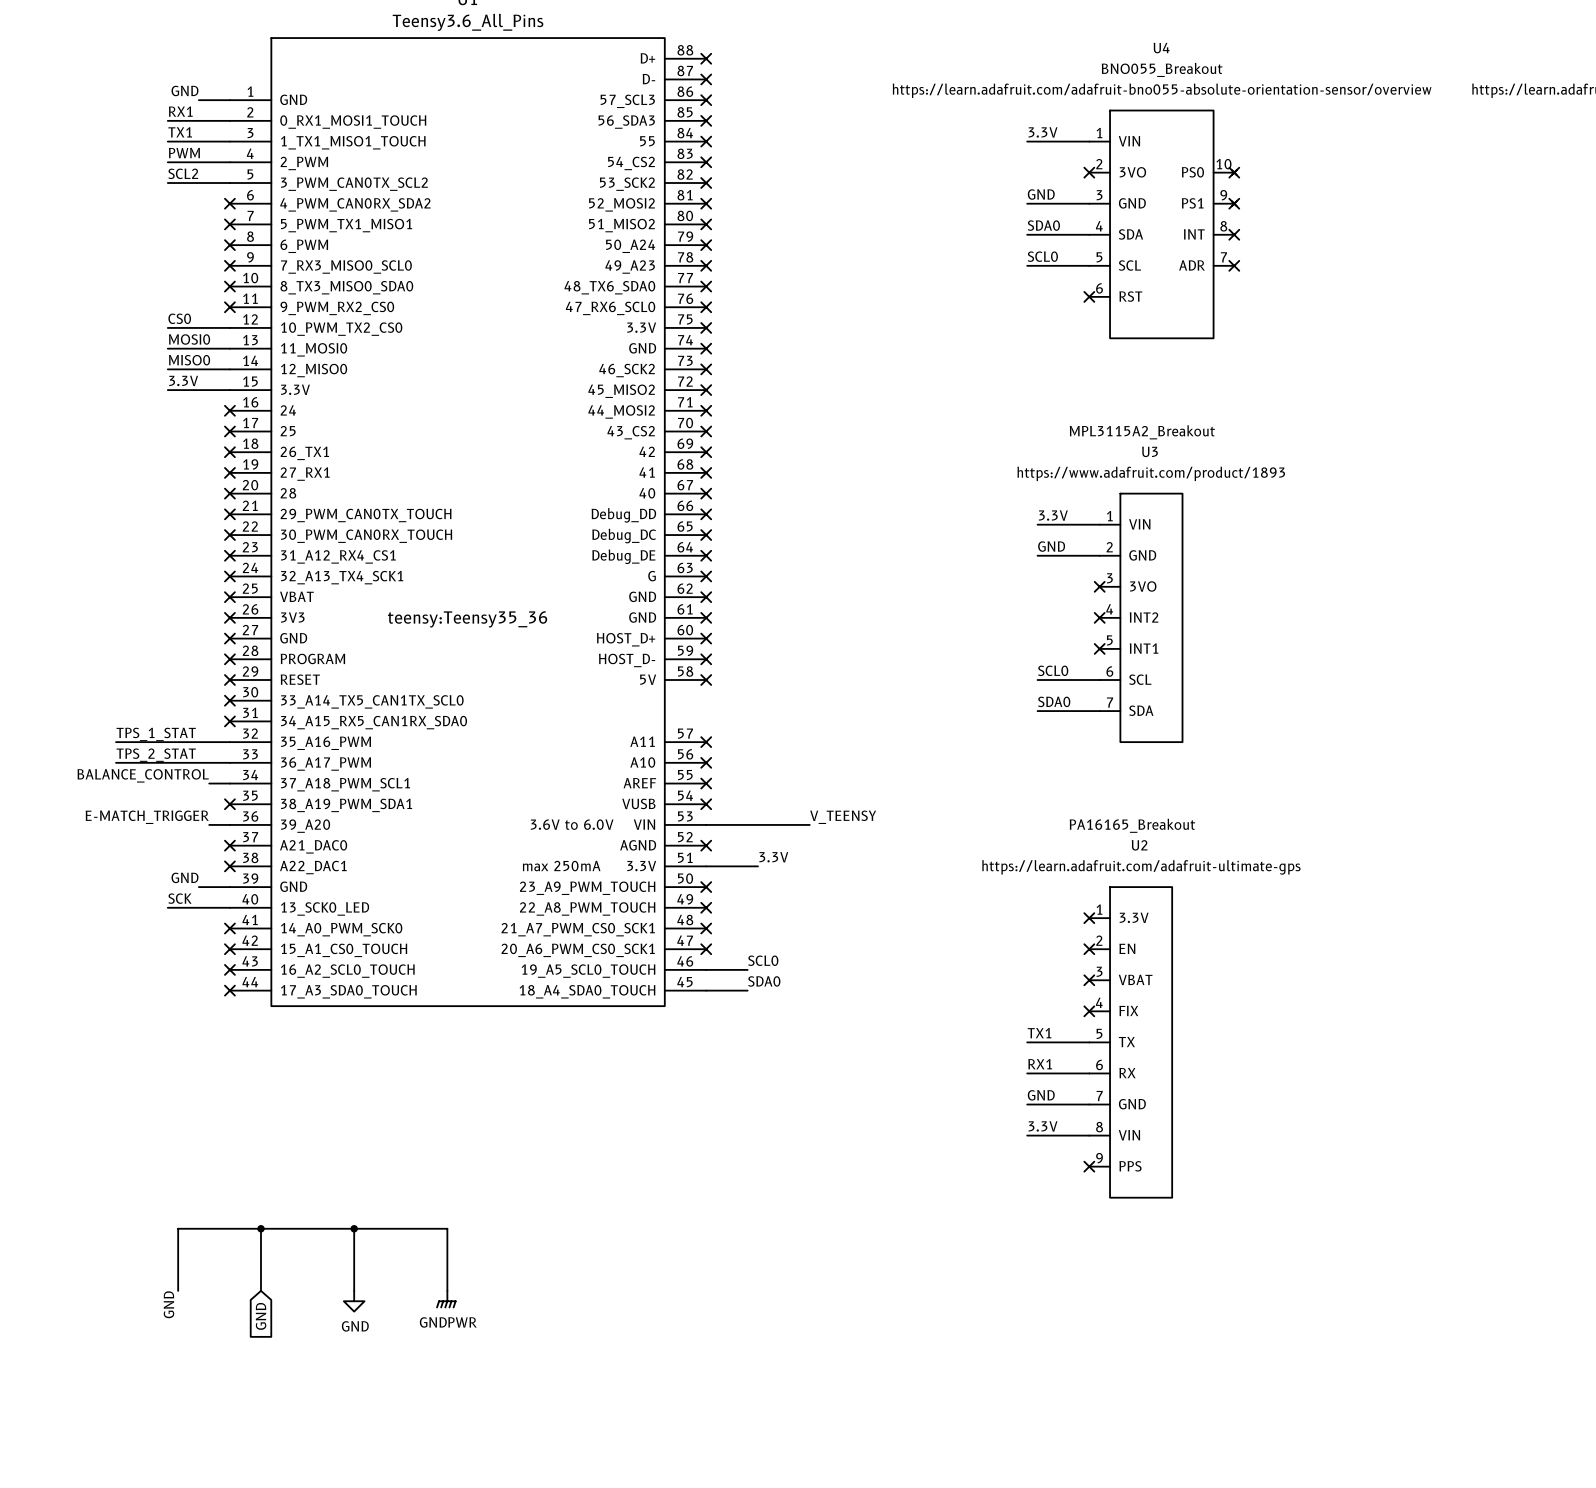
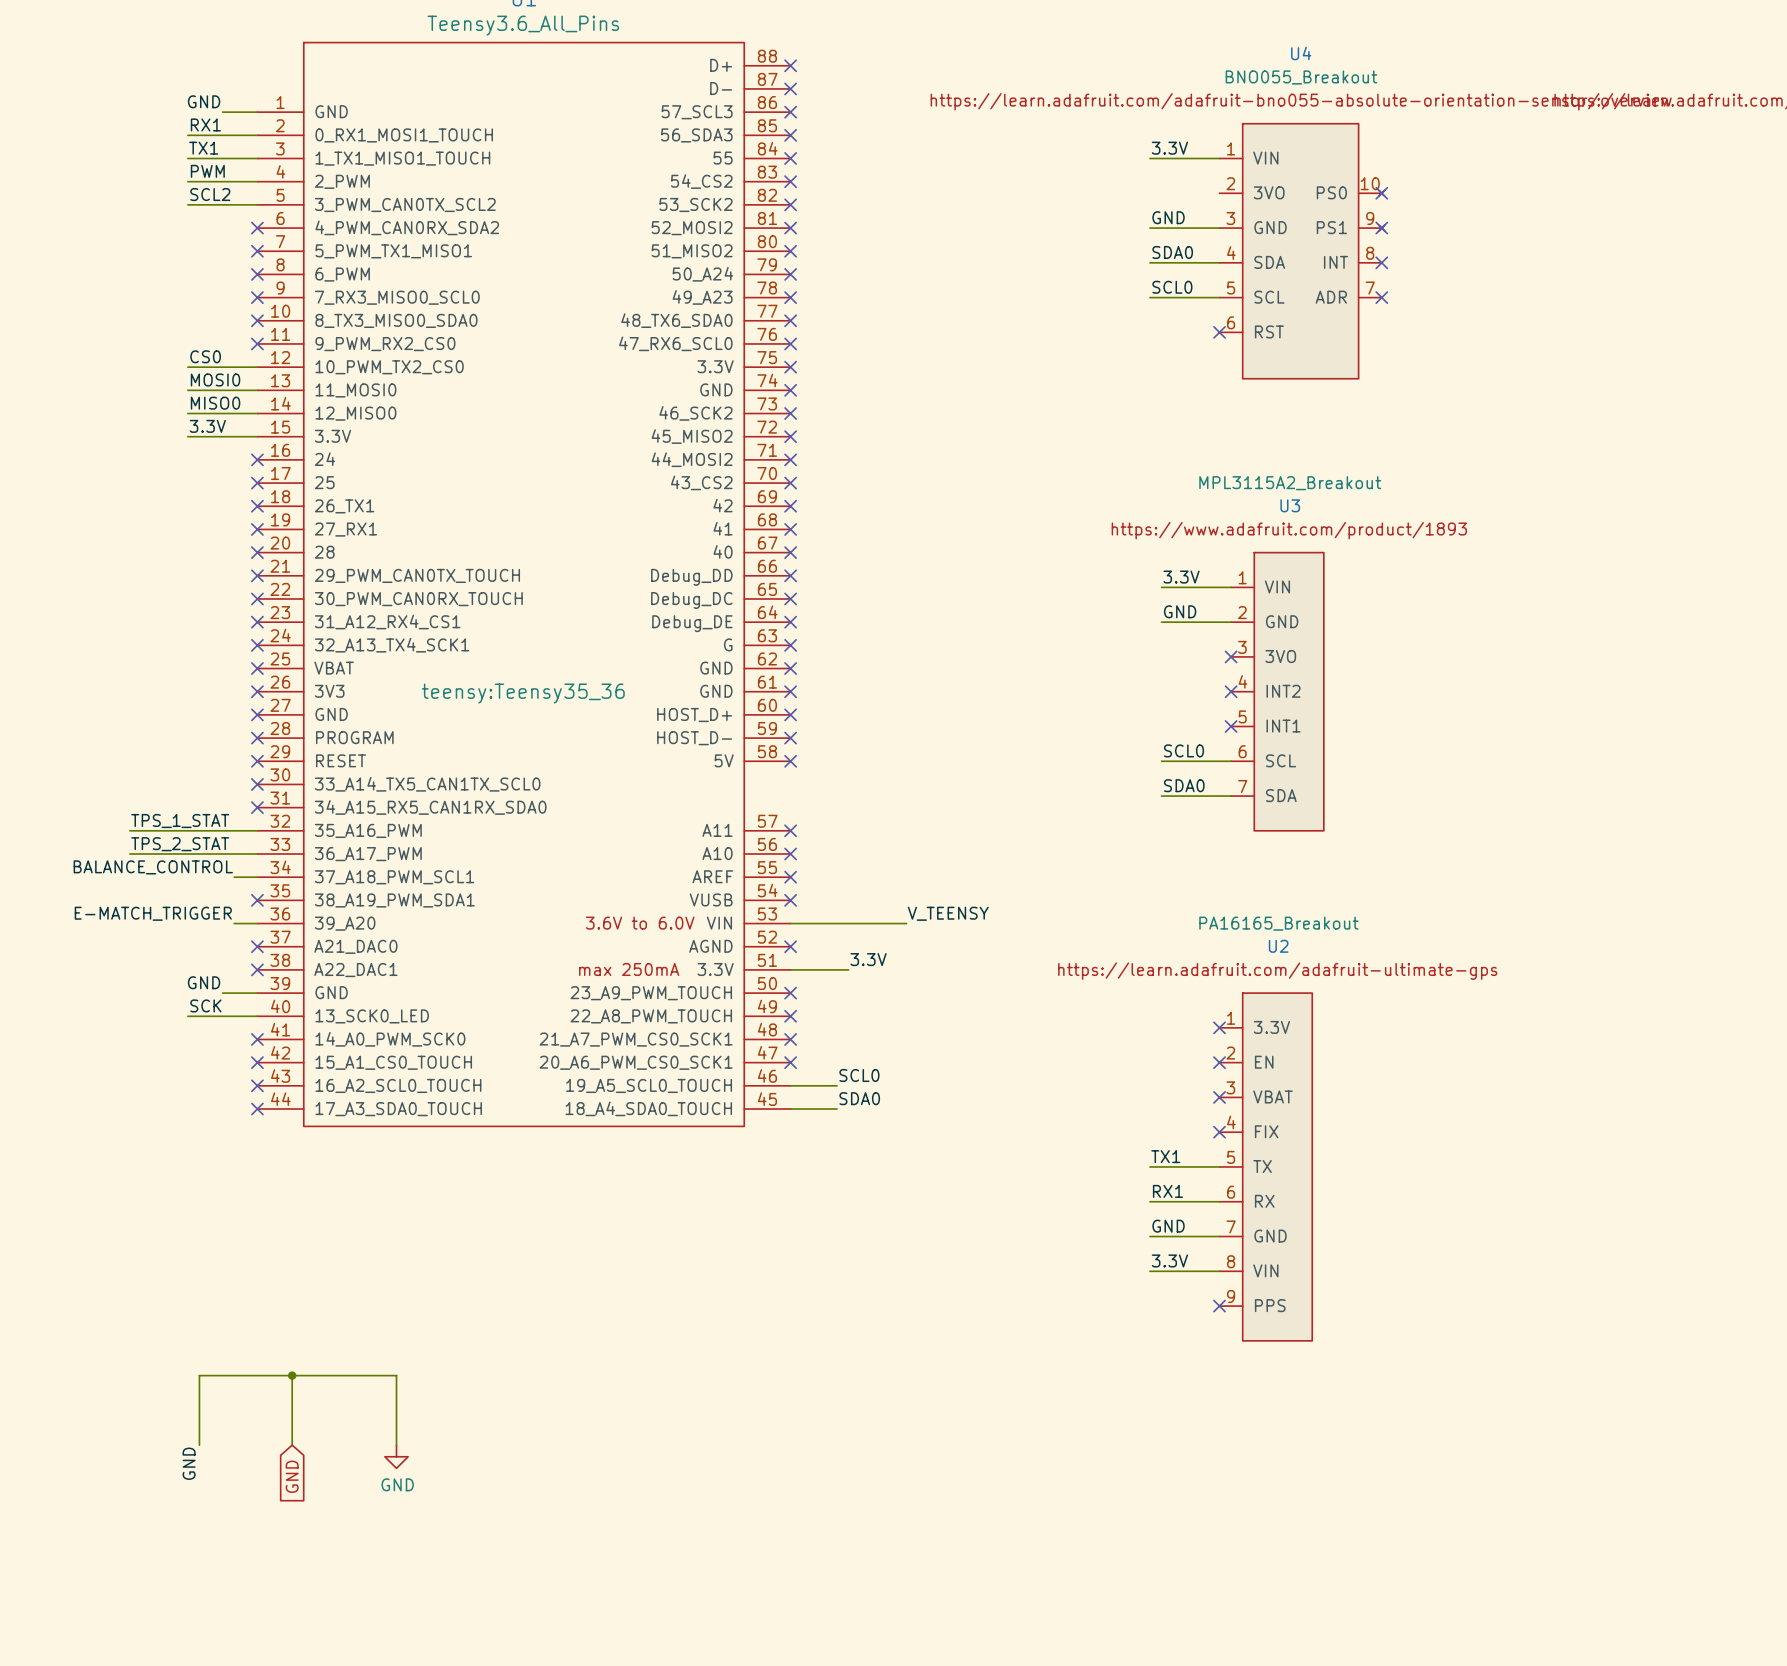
no-connect mark: (1089, 172) -> none
wire: (354, 1228) (447, 1228) (447, 1290) -> none
junction: (354, 1228) -> none
power symbol: GNDPWR (446, 1299) -> none

